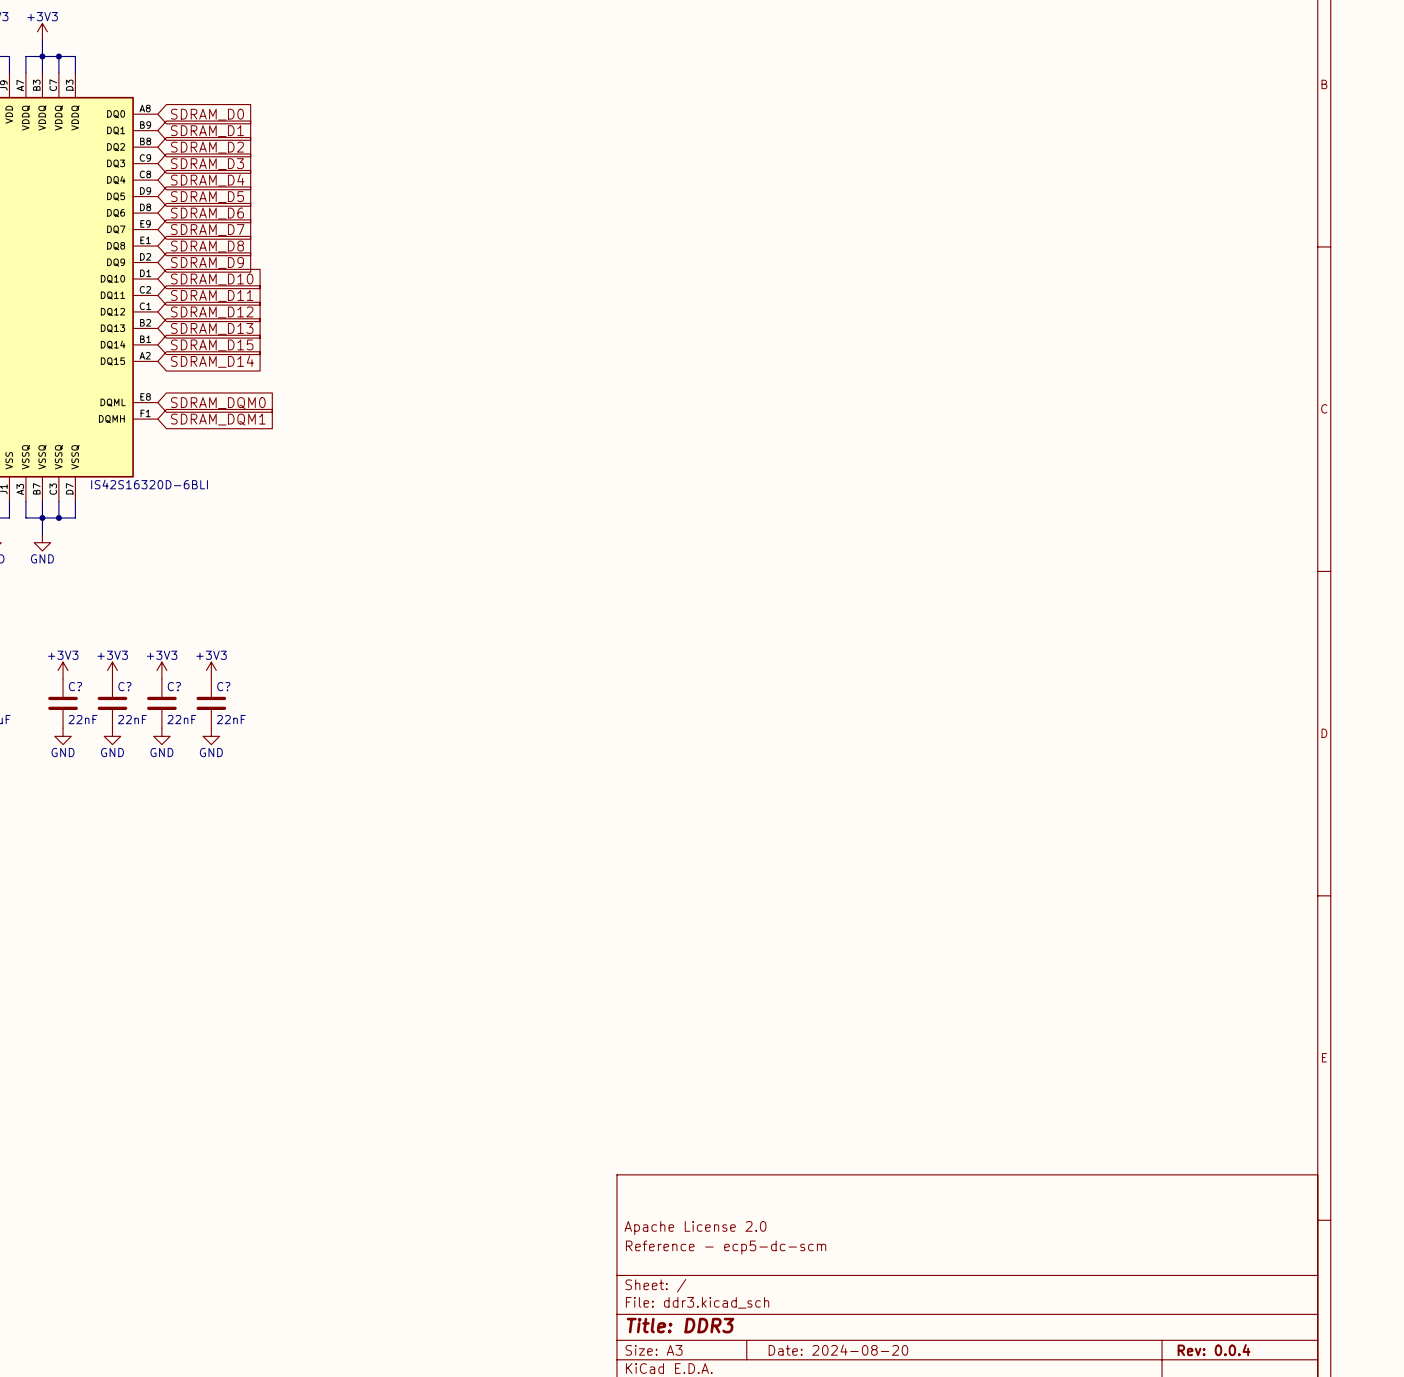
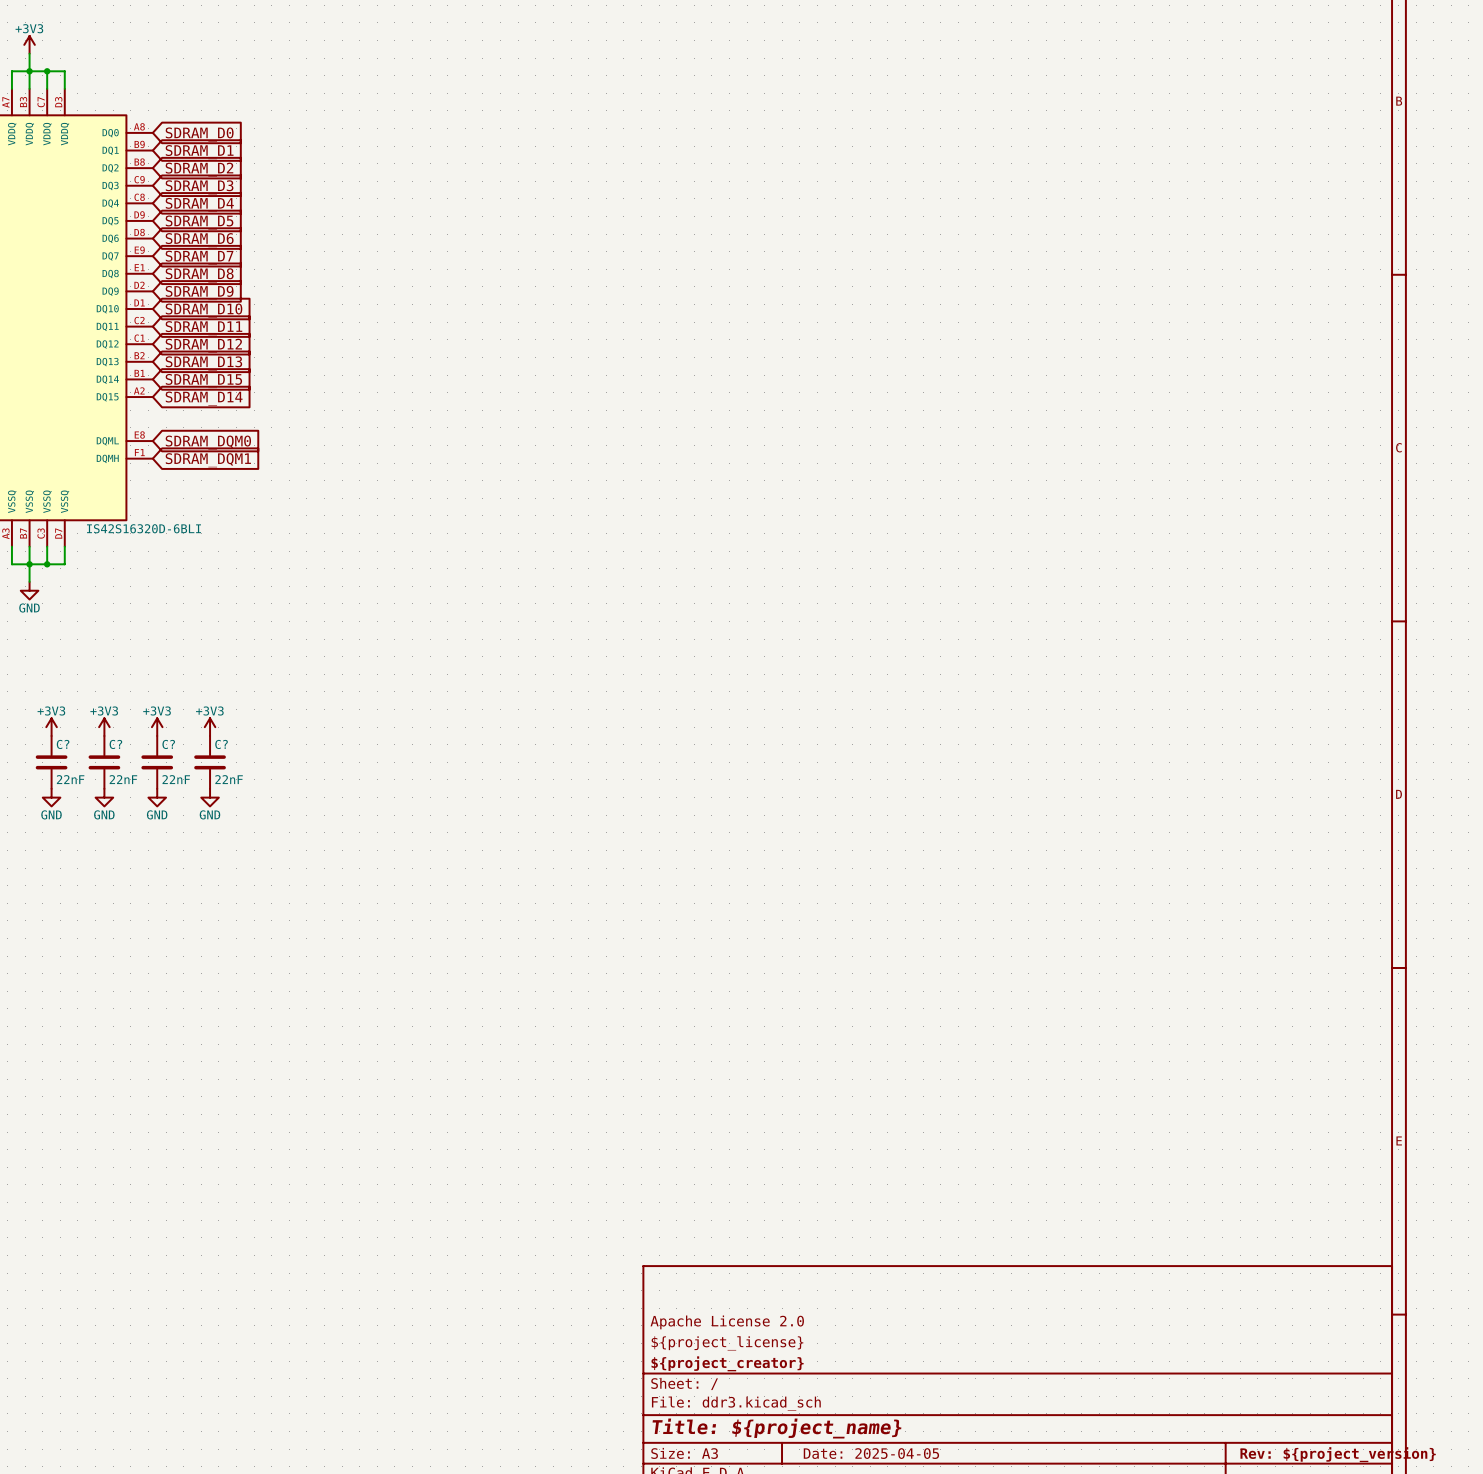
title block: Reference - ecp5-dc-scm (726, 1247) -> ${project_license} (727, 1343)
title block: none -> ${project_creator} (727, 1363)
title block: Title: DDR3 (680, 1325) -> Title: ${project_name} (776, 1428)
title block: Date: 2024-08-20 (838, 1350) -> Date: 2025-04-05 (871, 1453)
title block: Rev: 0.0.4 (1214, 1350) -> Rev: ${project_version} (1338, 1454)

